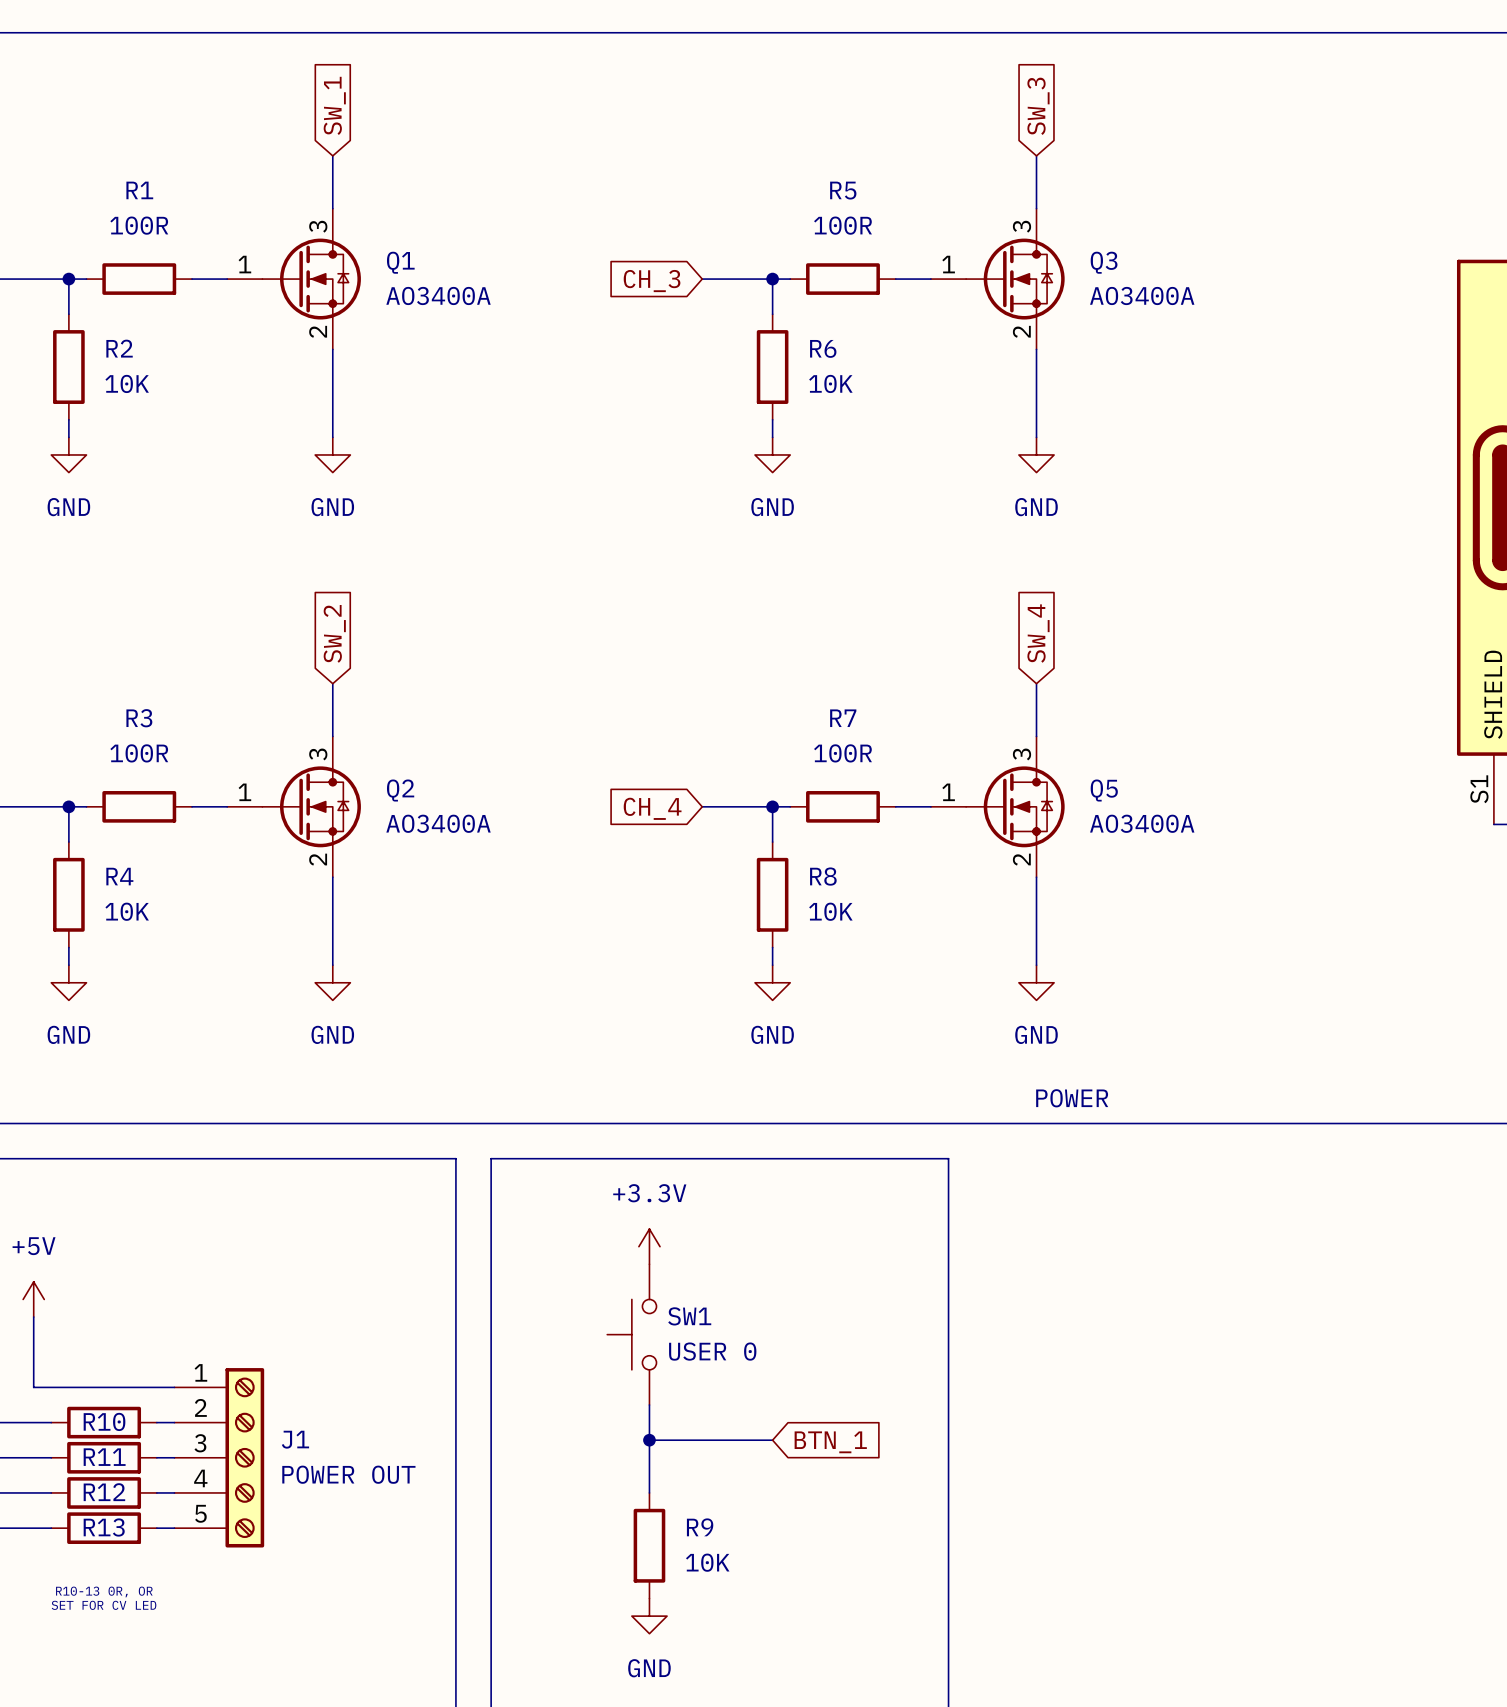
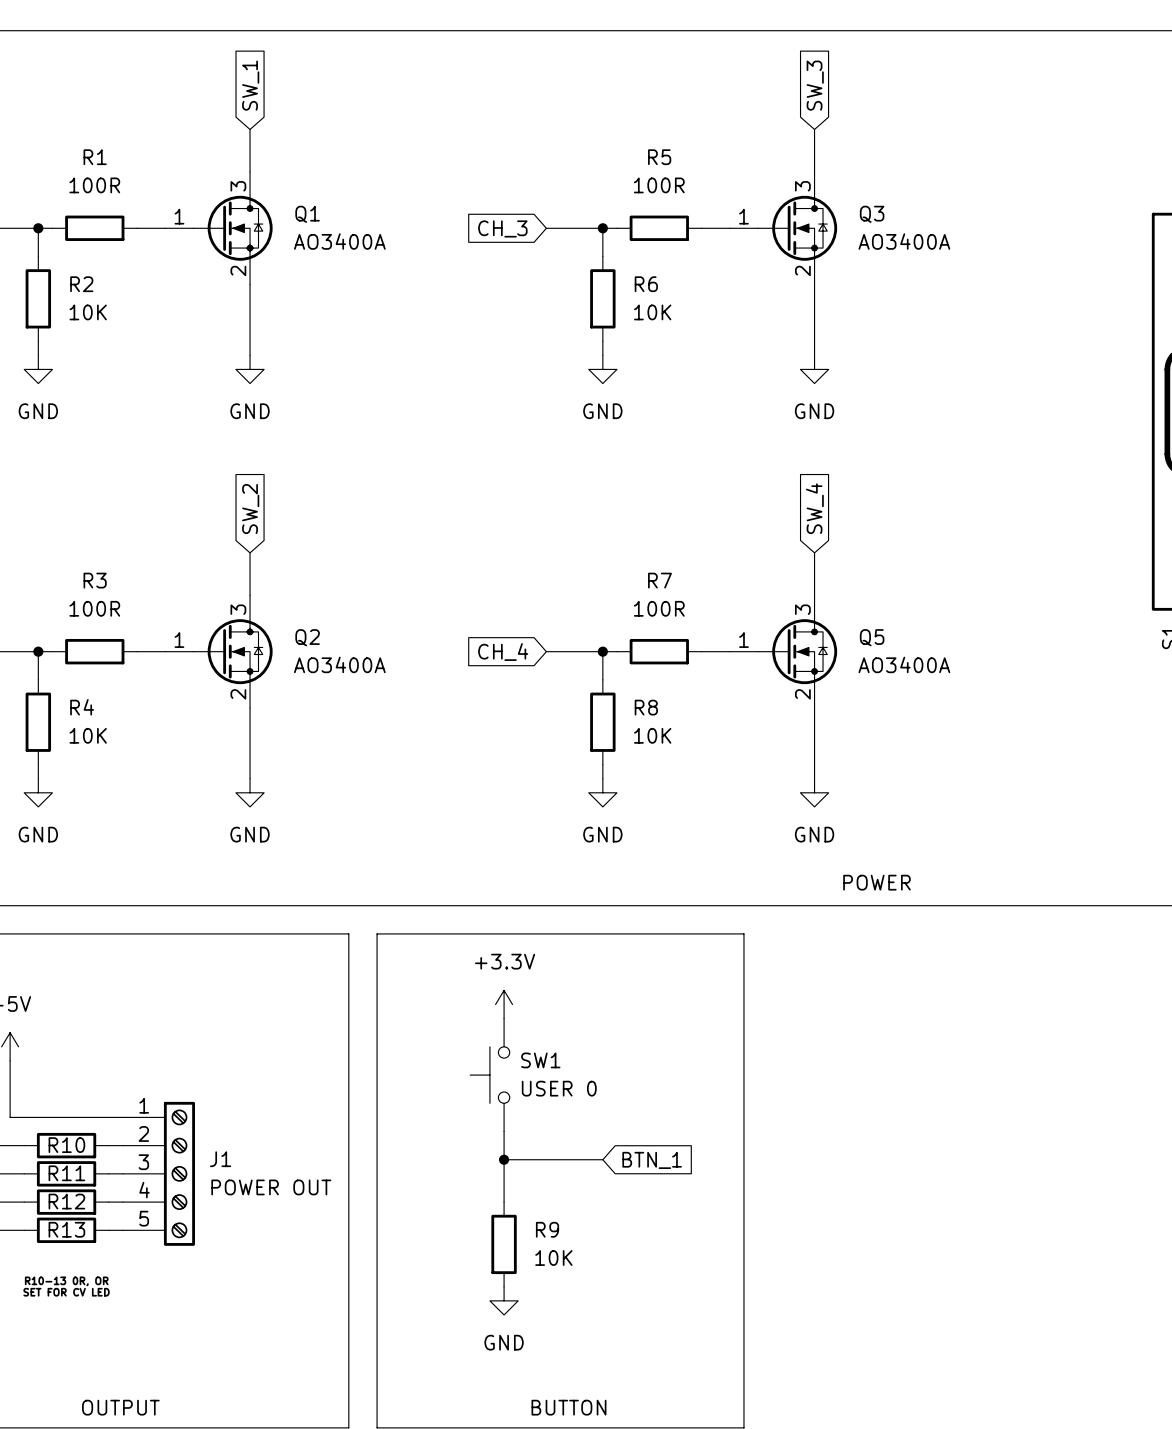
text position: POWER (1072, 1098) -> POWER (876, 882)

